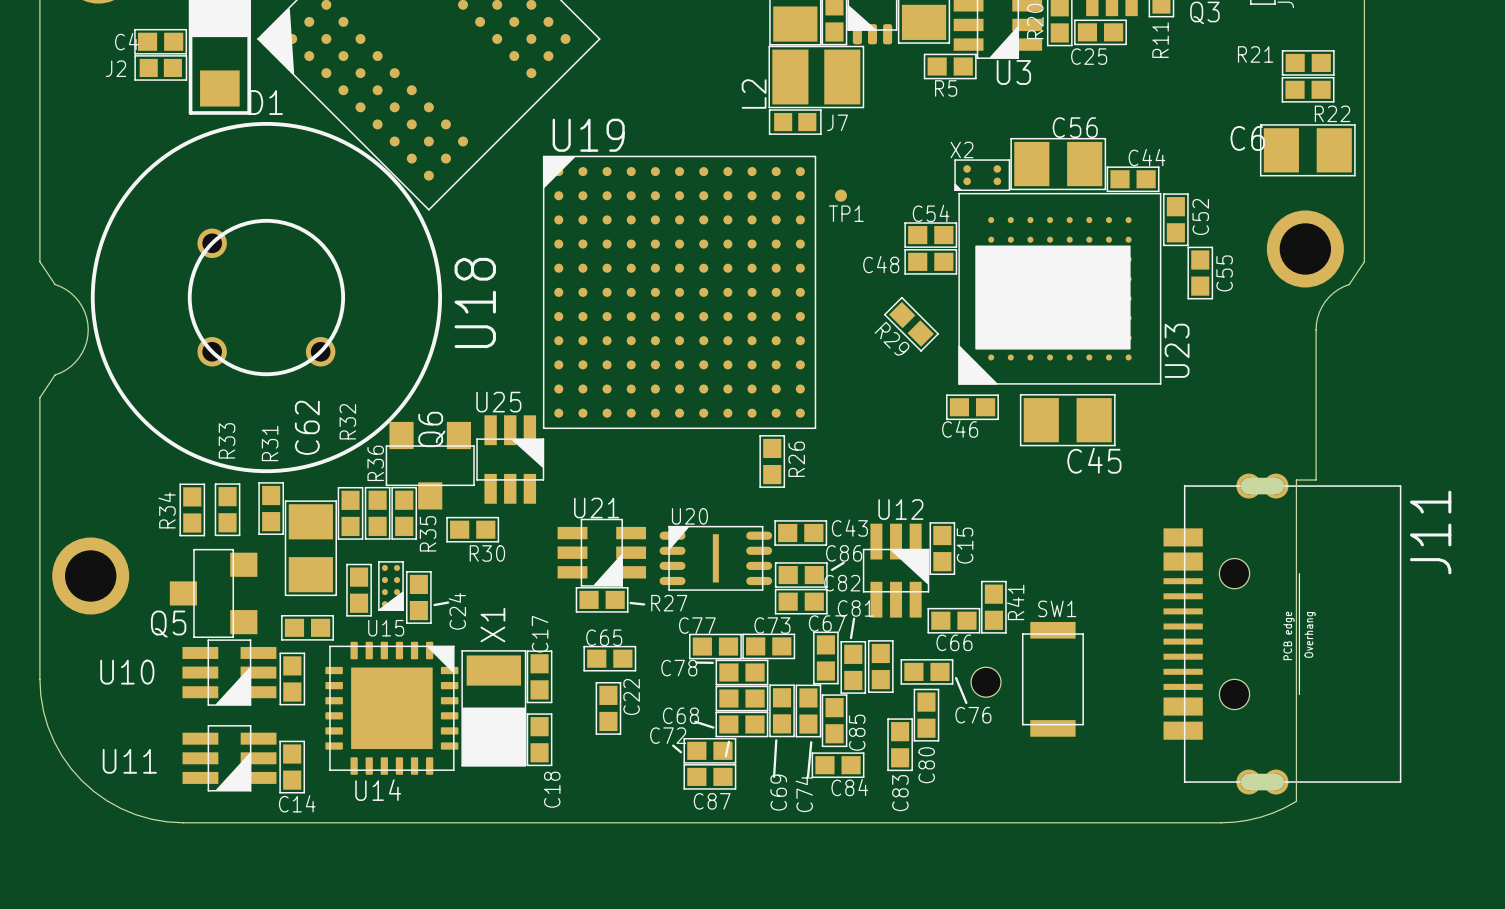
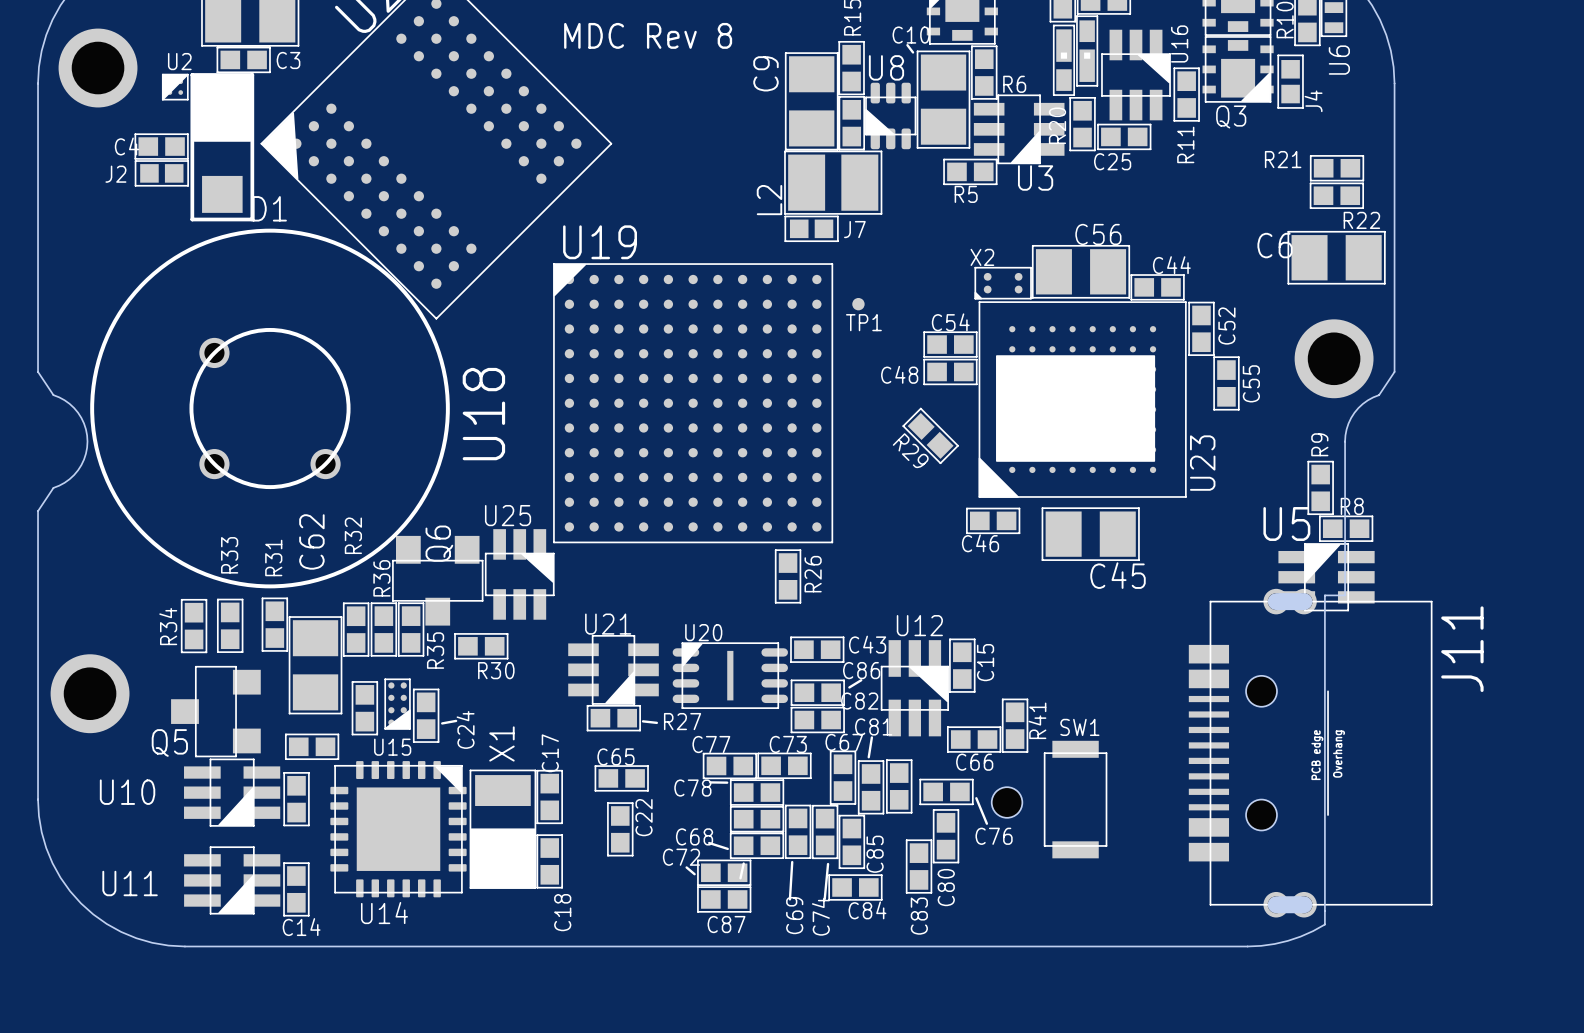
R9: none -> (1320, 487)
R8: none -> (1346, 528)
U5: none -> (1326, 577)

